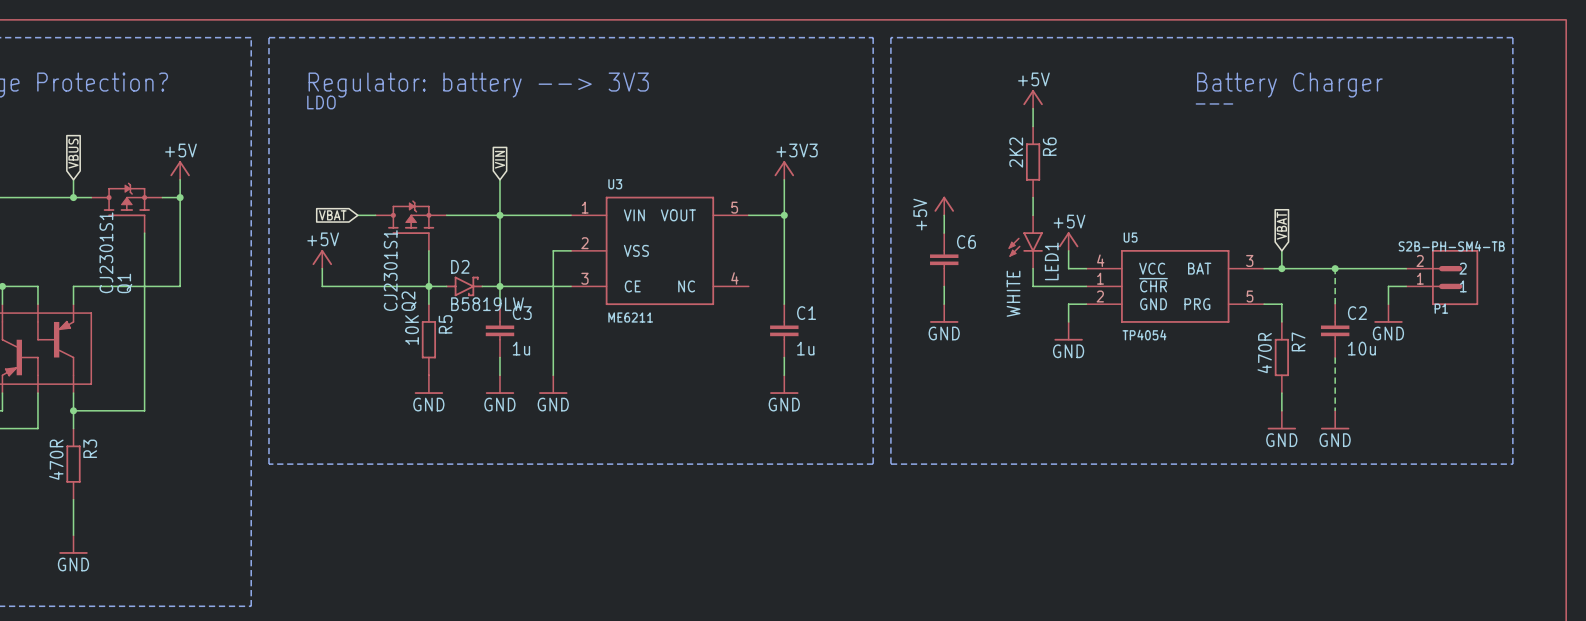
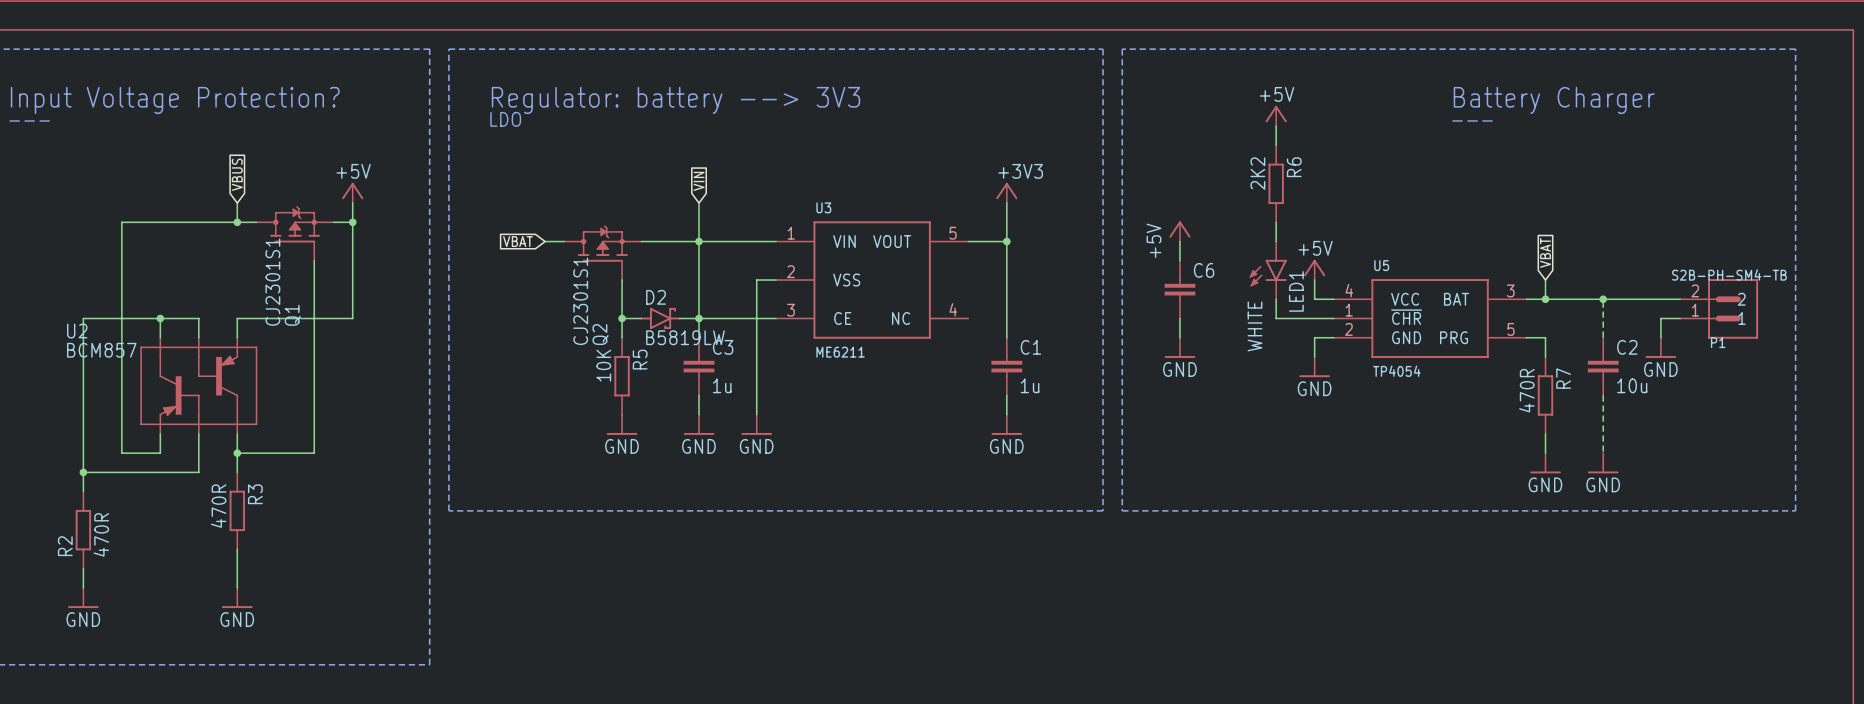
power symbol: +5V (322, 259) -> none
wire: (322, 268) (322, 286) (428, 286) -> none

